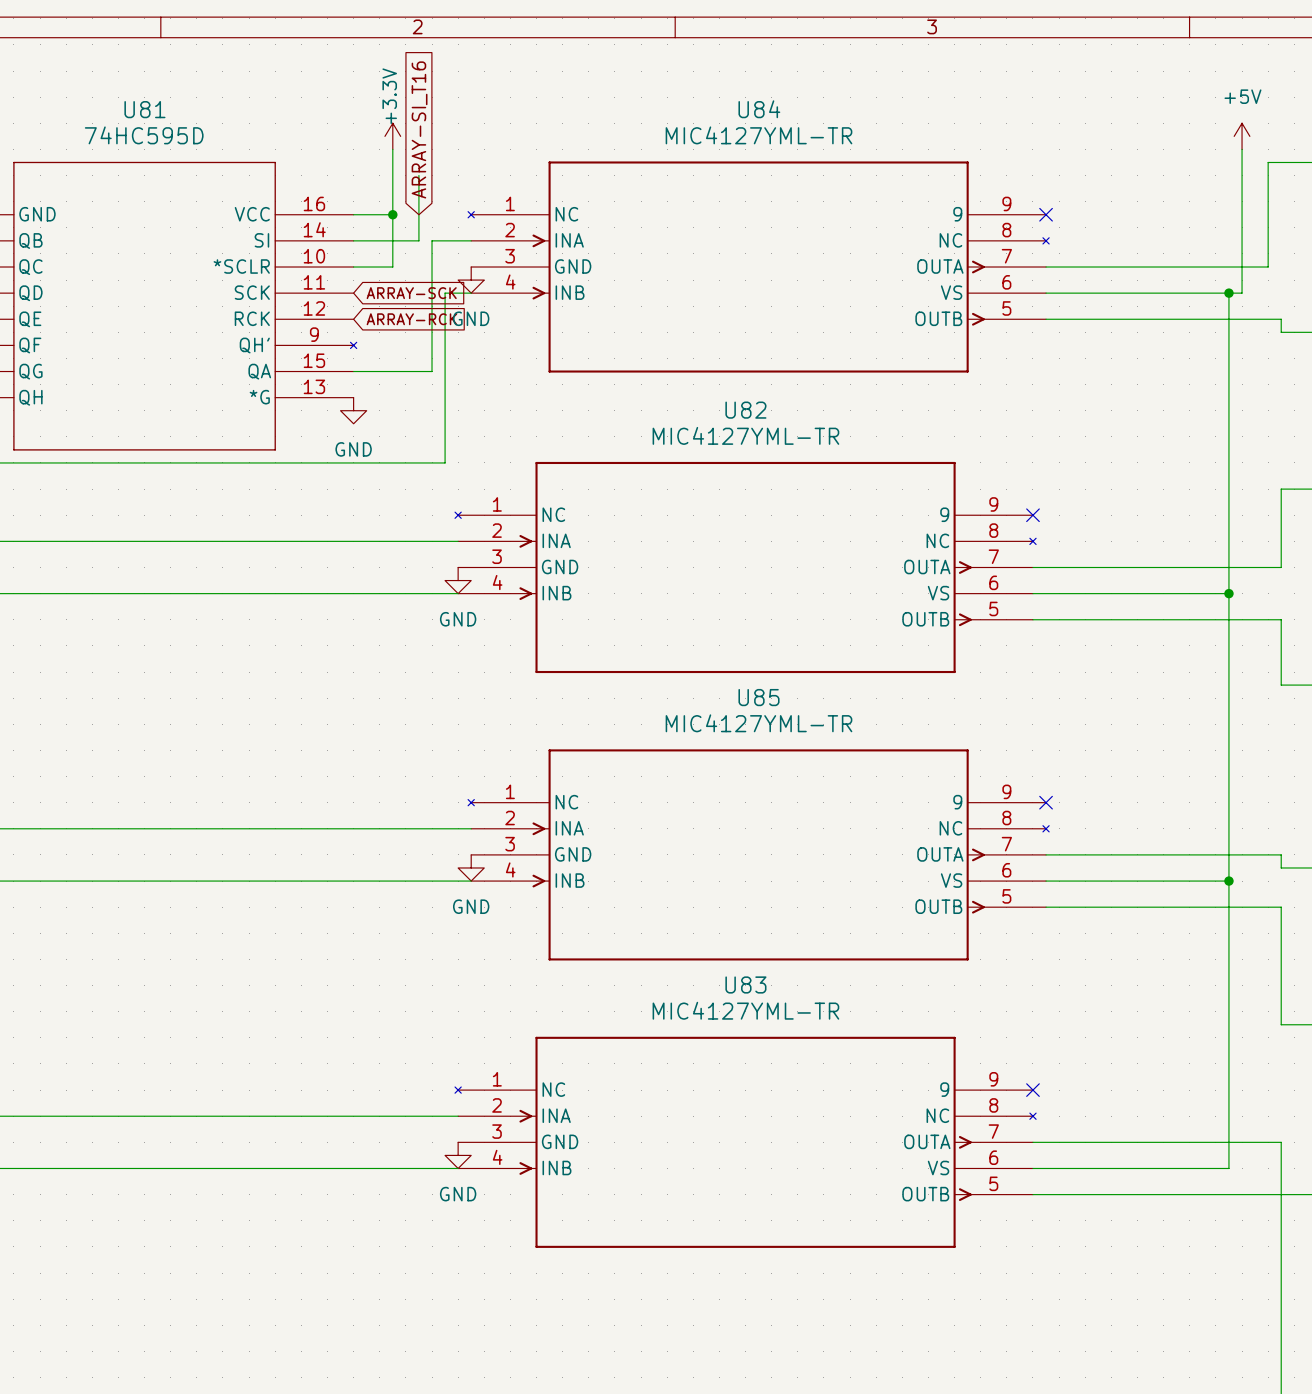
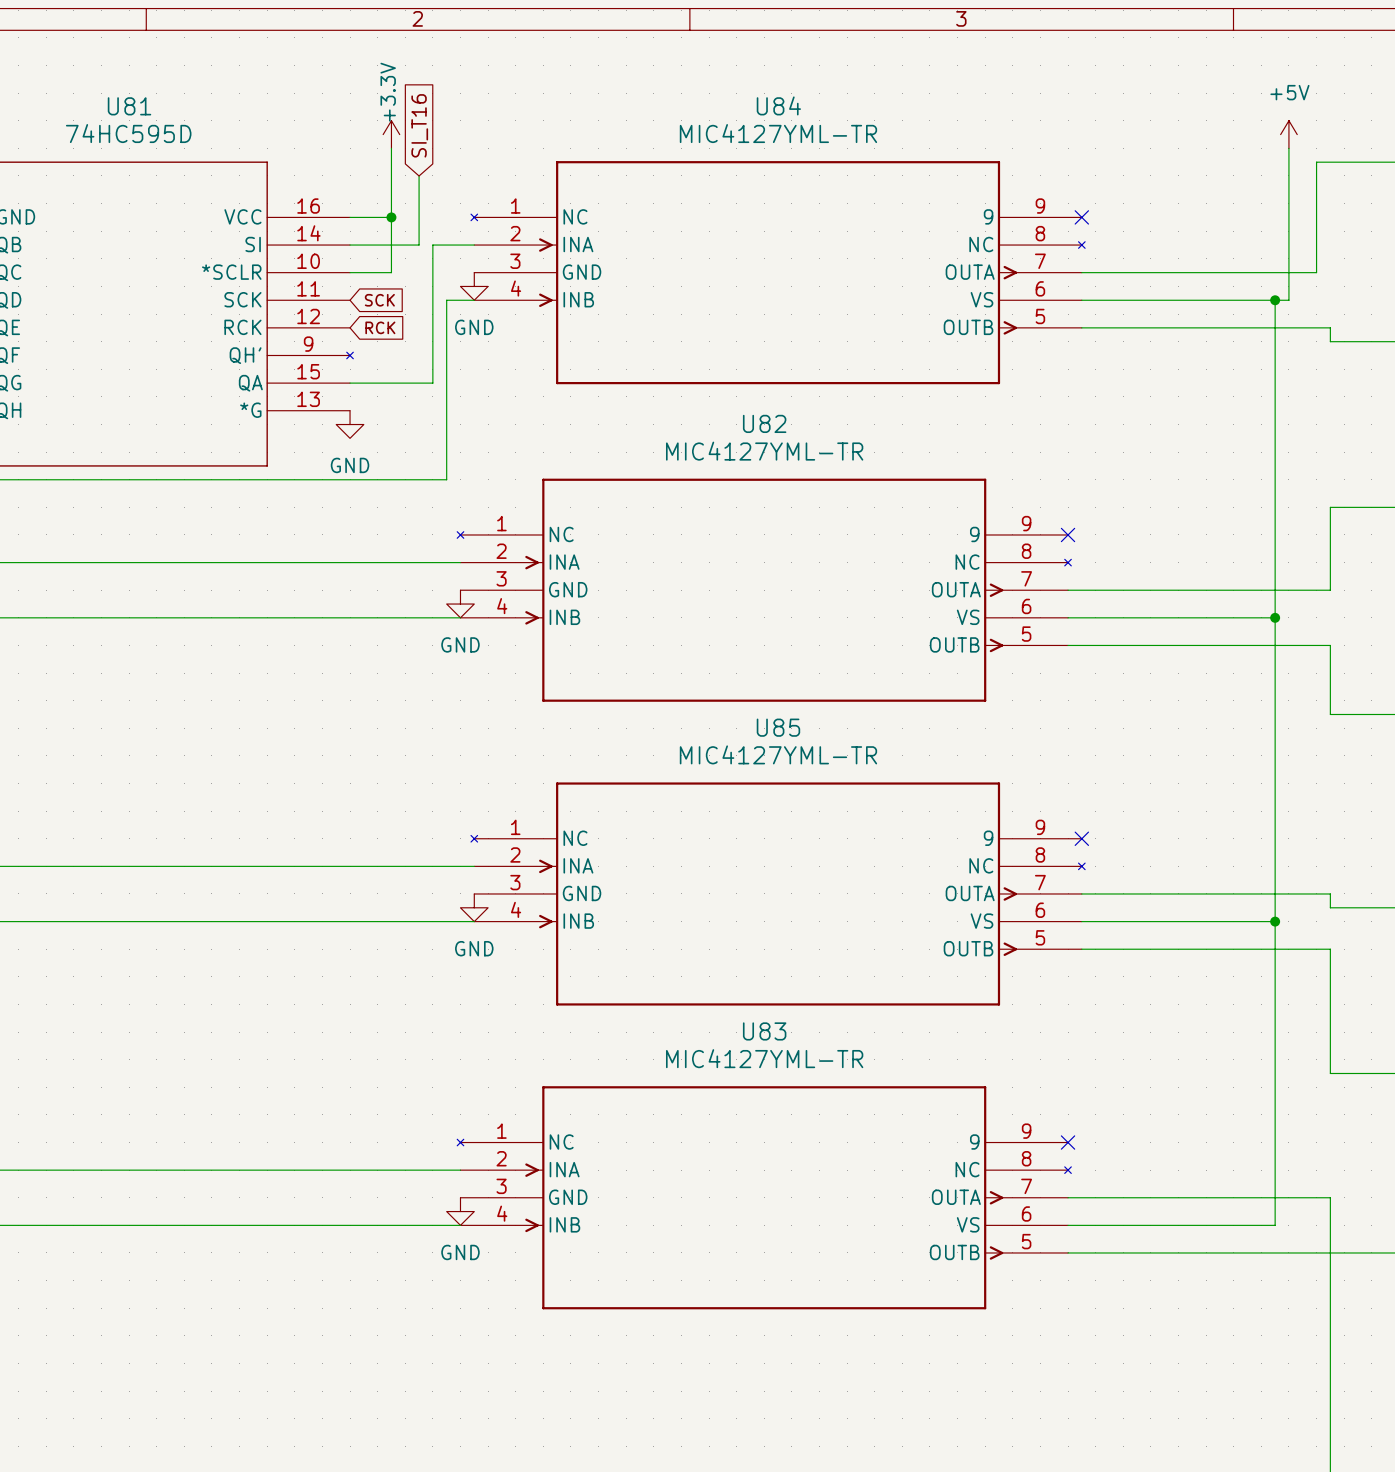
global label: ARRAY-SI_T16 (419, 129) -> SI_T16 (419, 125)
global label: ARRAY-SCK (411, 293) -> SCK (379, 300)
global label: ARRAY-RCK (411, 319) -> RCK (380, 327)

